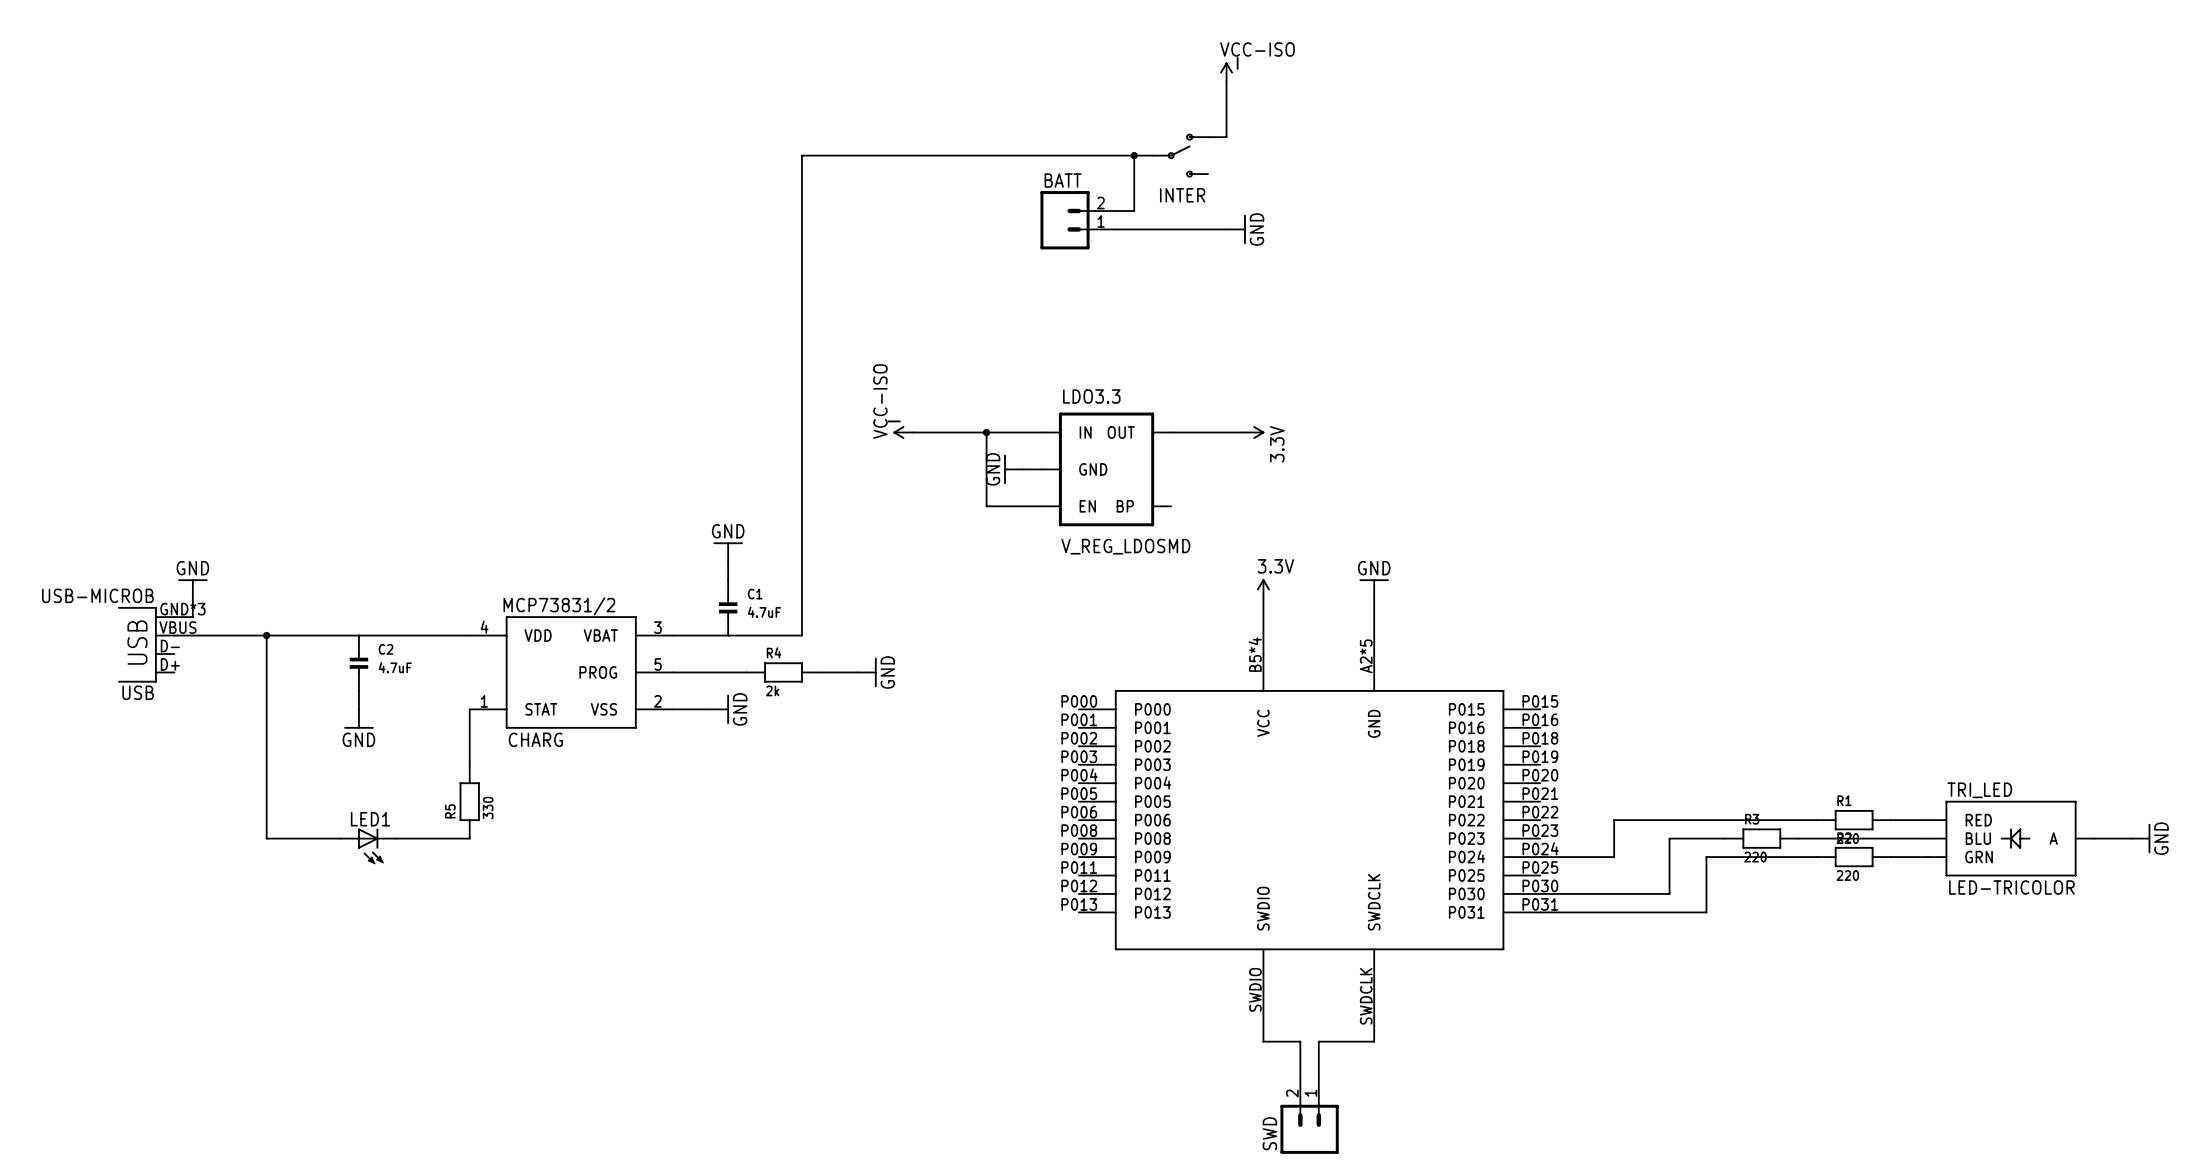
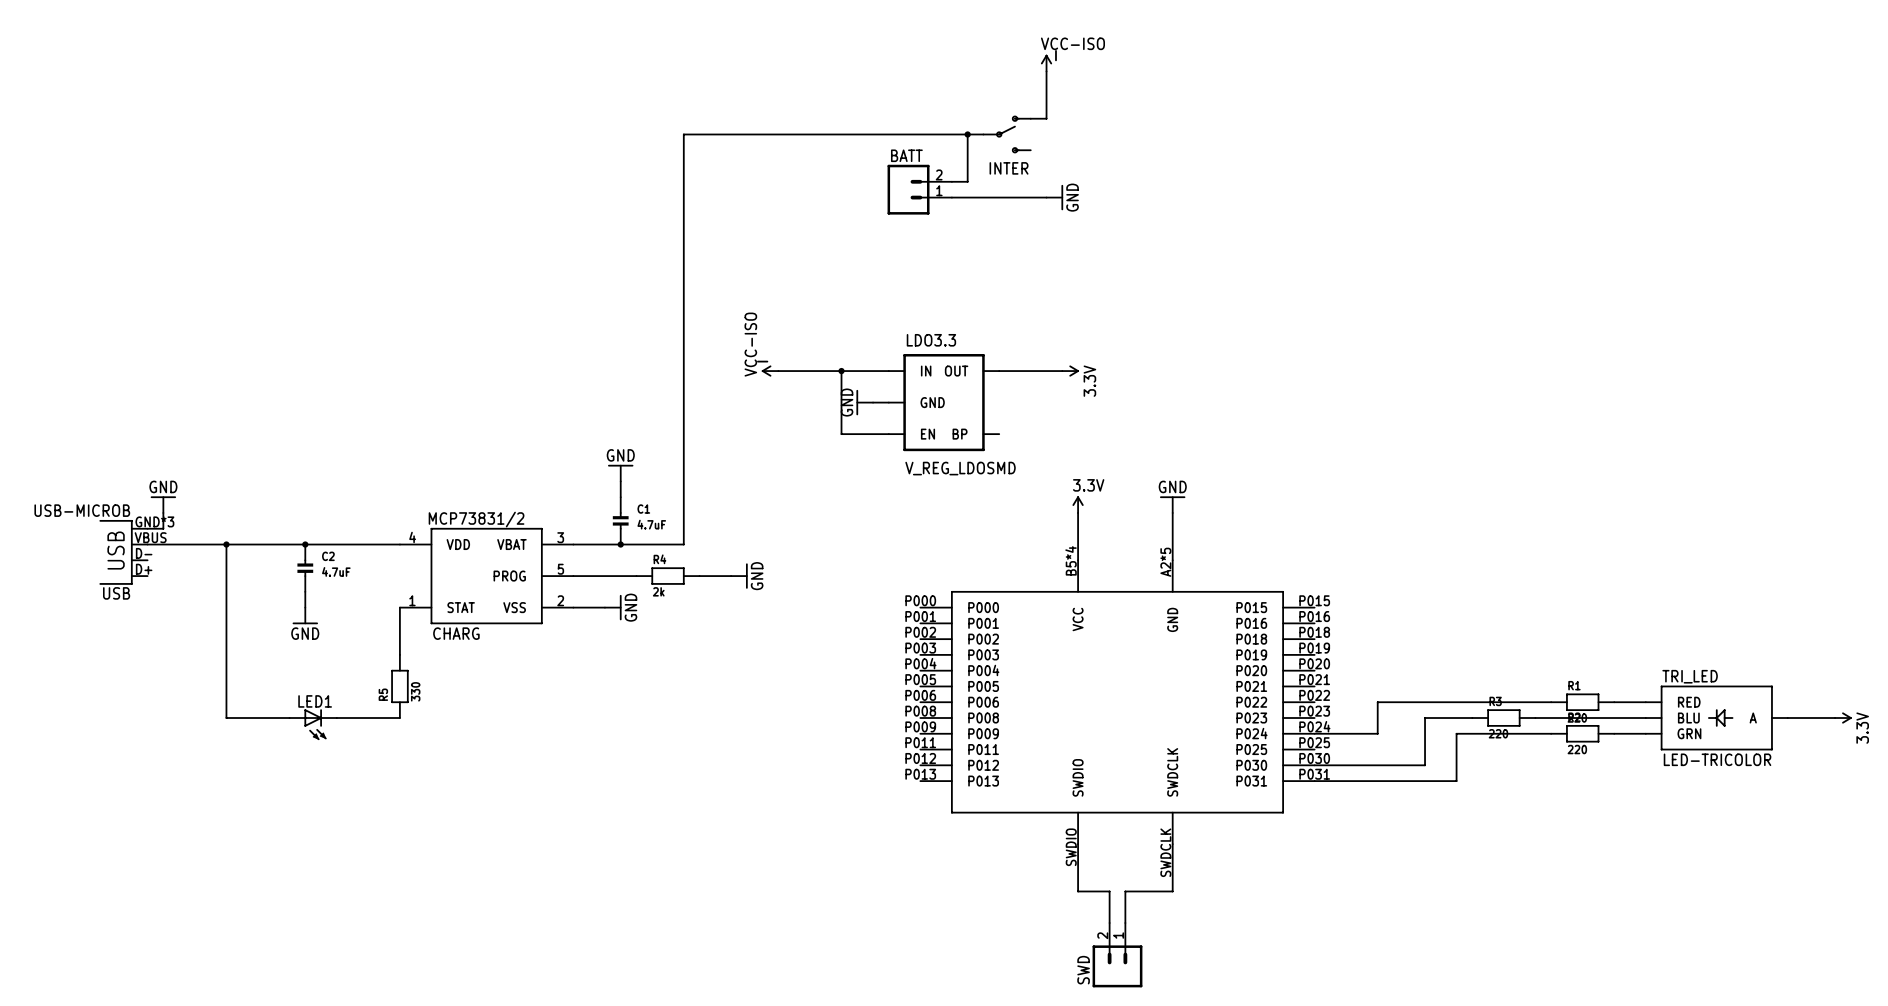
junction: none -> (305, 544)
junction: none -> (620, 544)
power symbol: GND (2140, 838) -> none
power symbol: none -> 3.3V (1843, 718)

